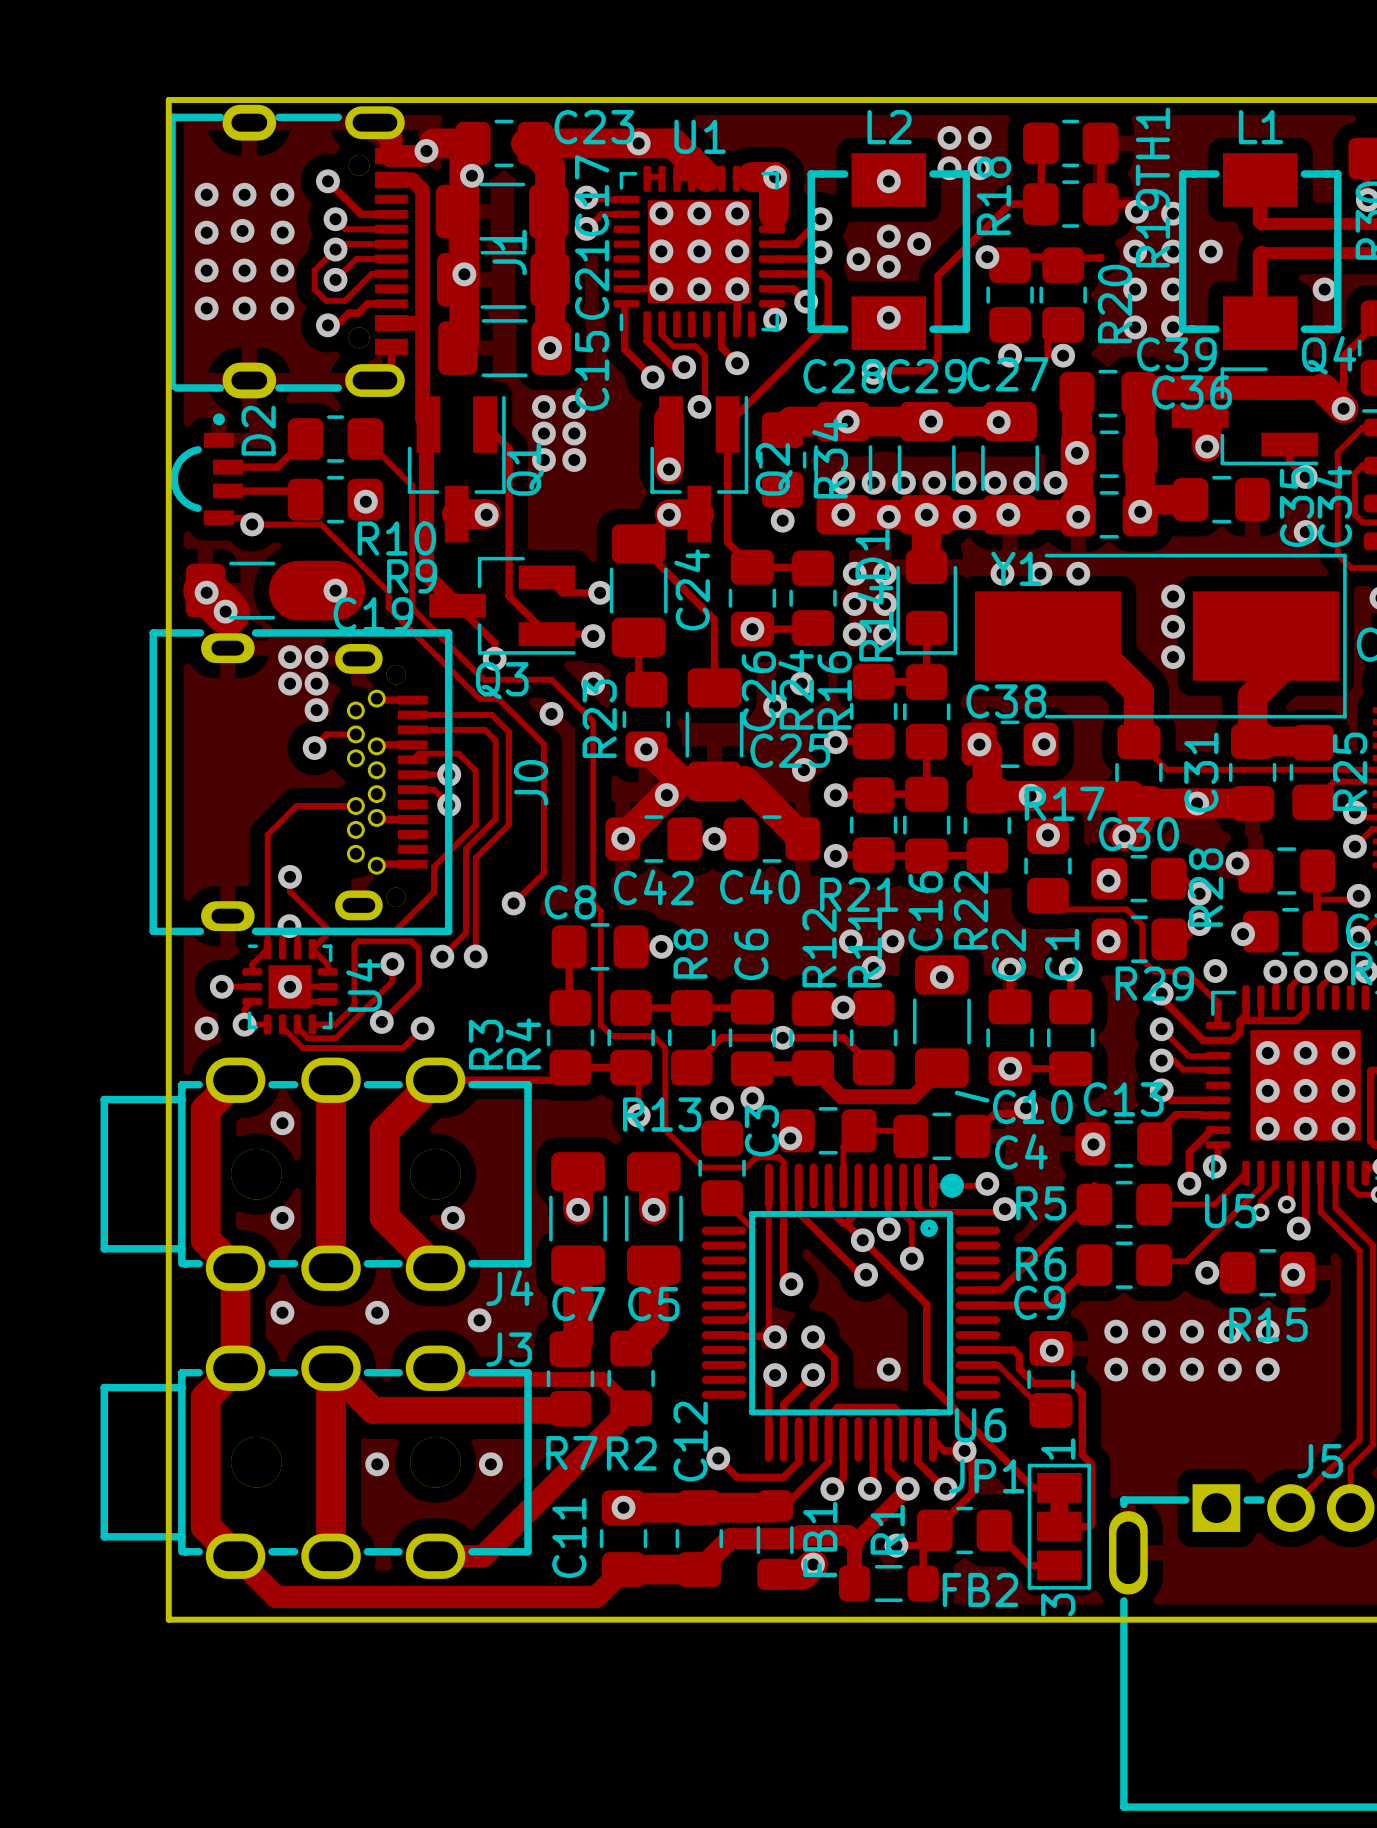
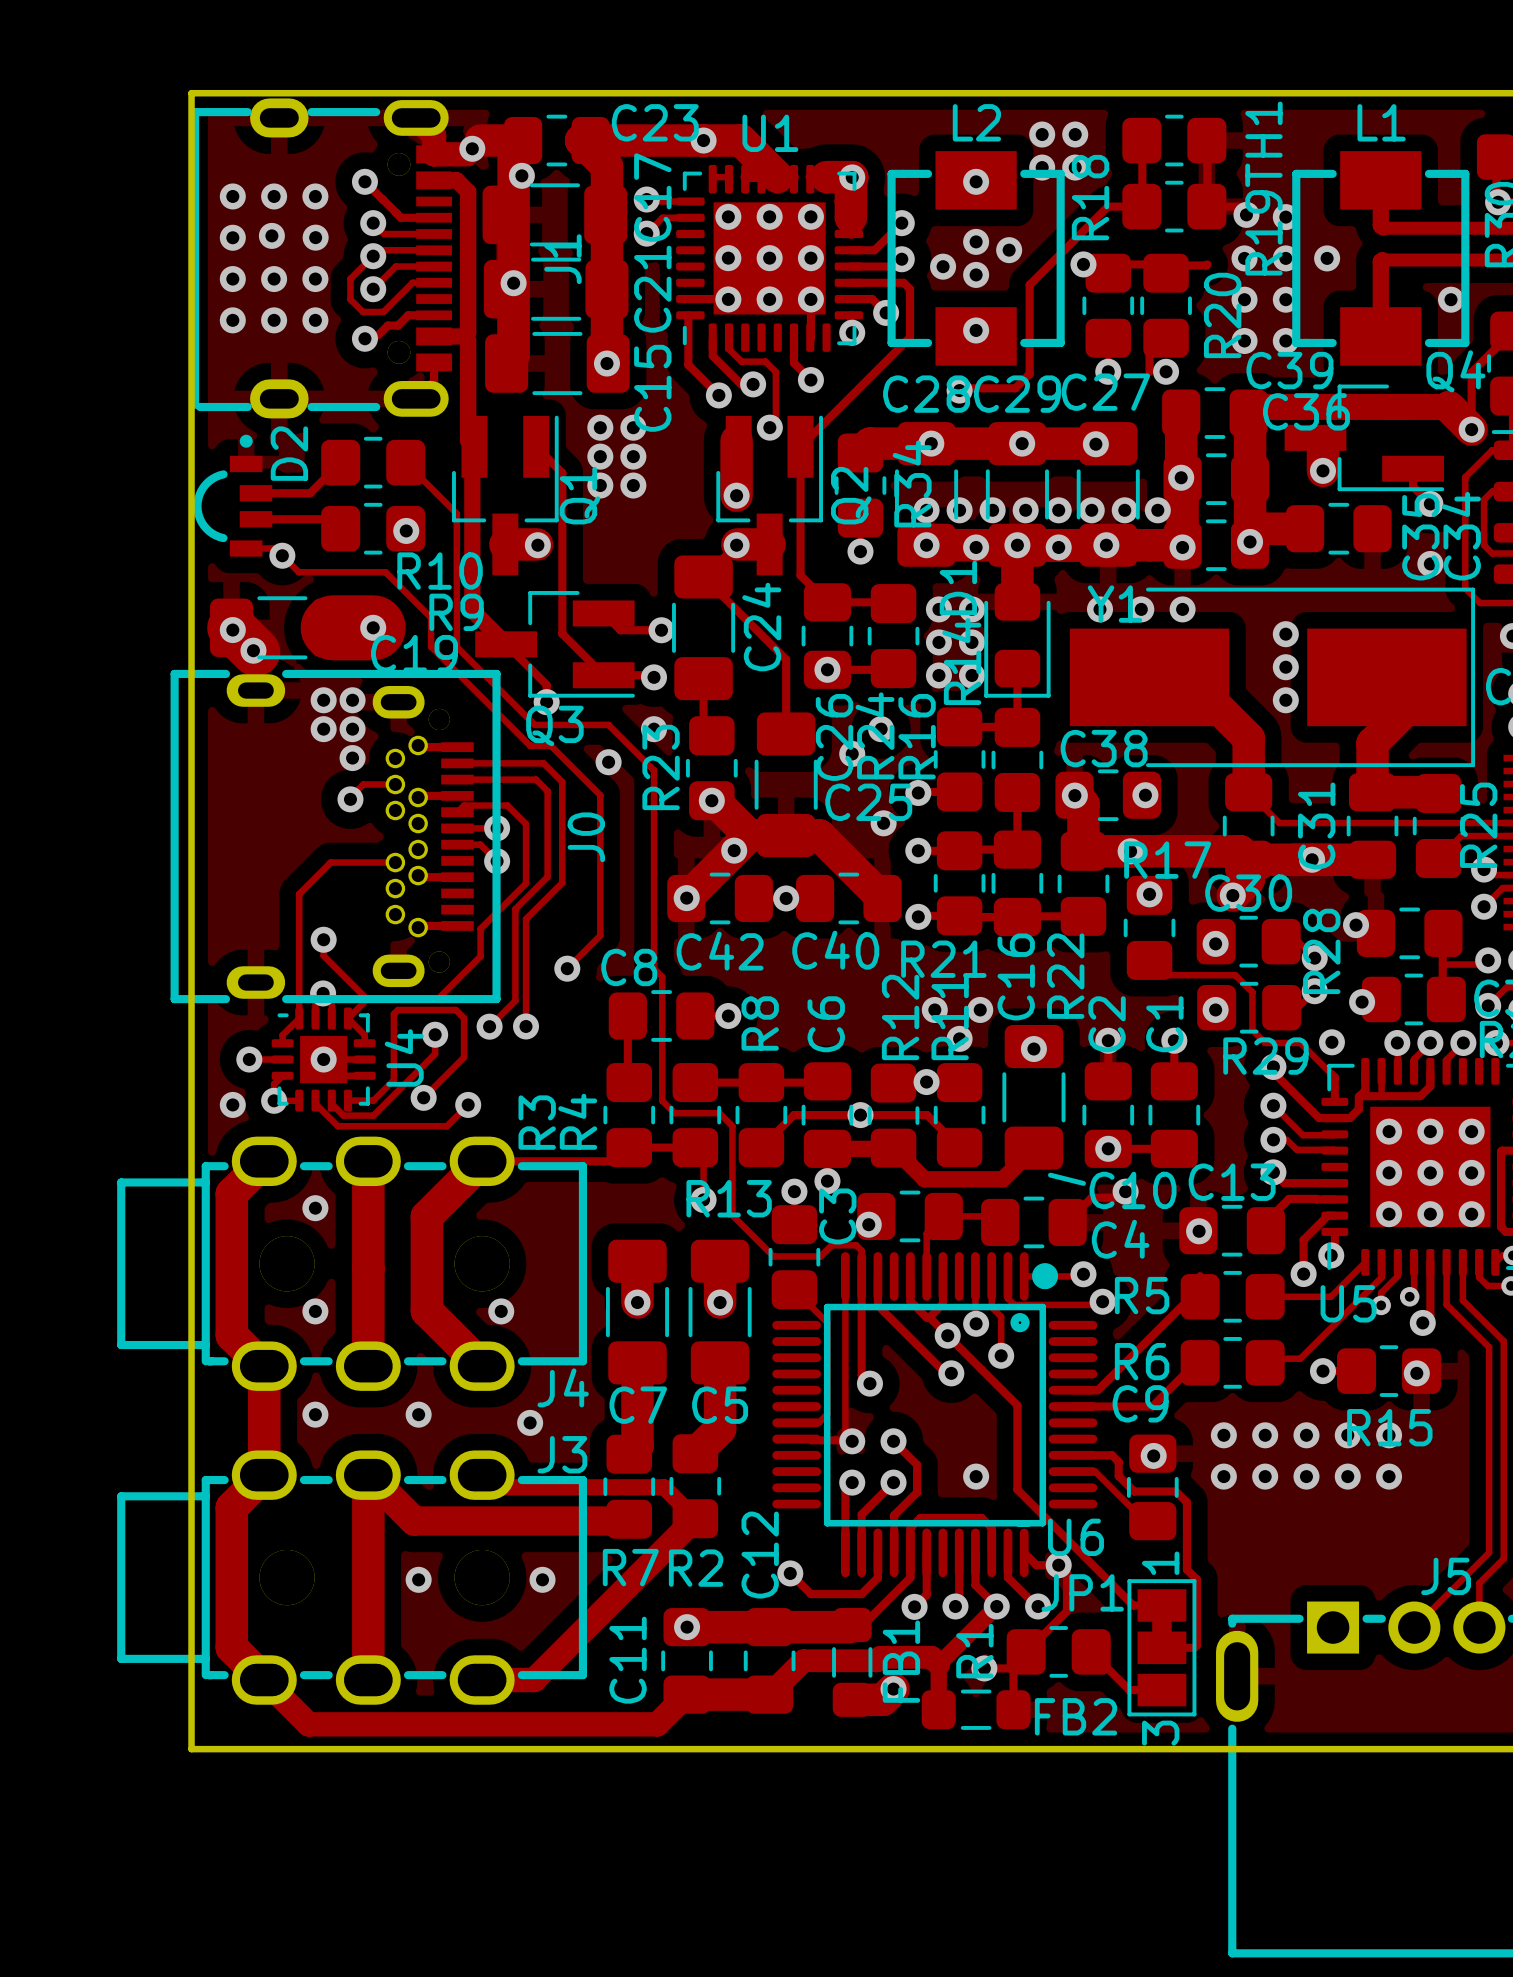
track: (252, 524) (321, 524) (388, 591) -> (282, 555) (298, 572) (385, 572) (431, 617) (431, 629)

